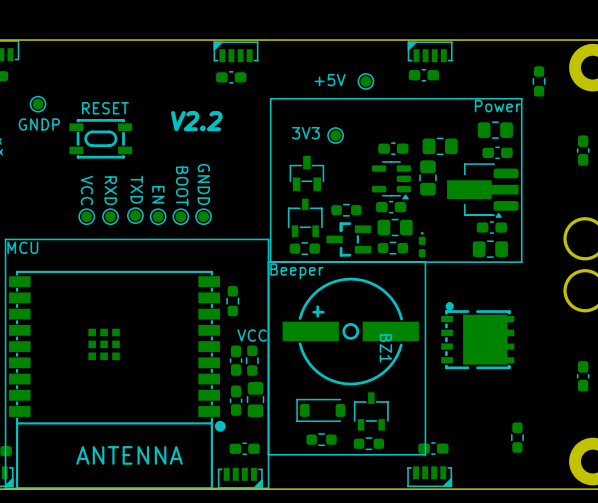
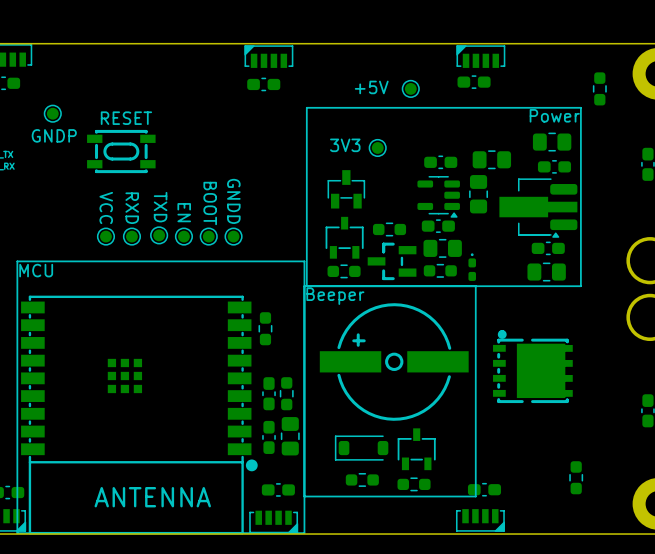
text: V2.2 (196, 121) -> none
text: VCC (252, 335) -> none
BZ1 name: BZ1 (385, 348) -> none

